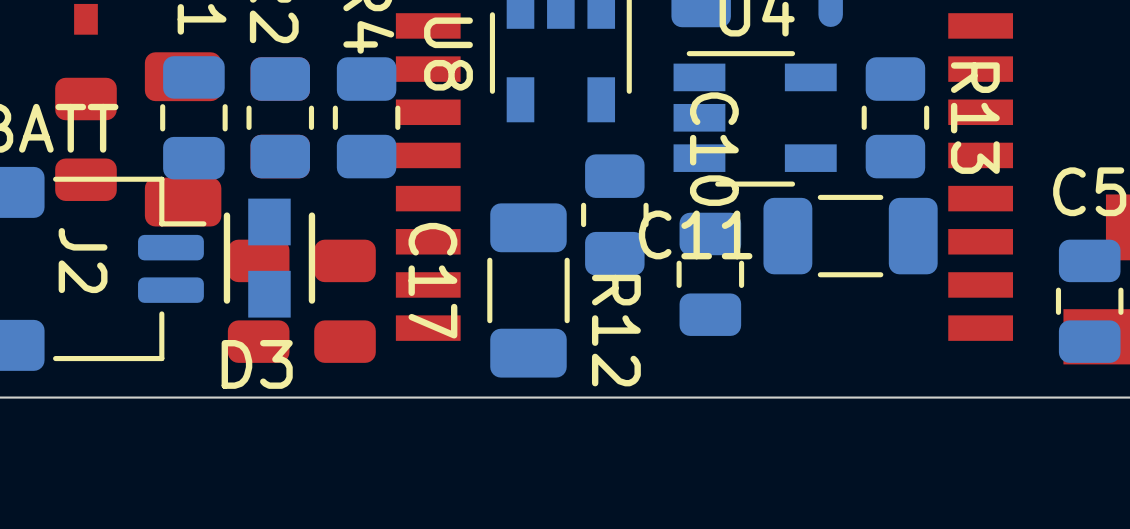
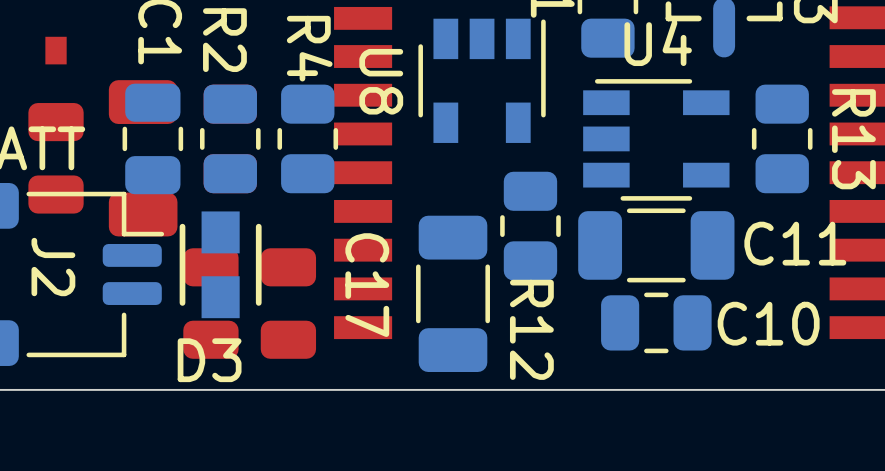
C11 name position: C11 (695, 234) -> C11 (795, 243)
C11 position: (850, 236) -> (656, 245)
C10 rotation: 0° (710, 274) -> 90° clockwise (656, 322)

